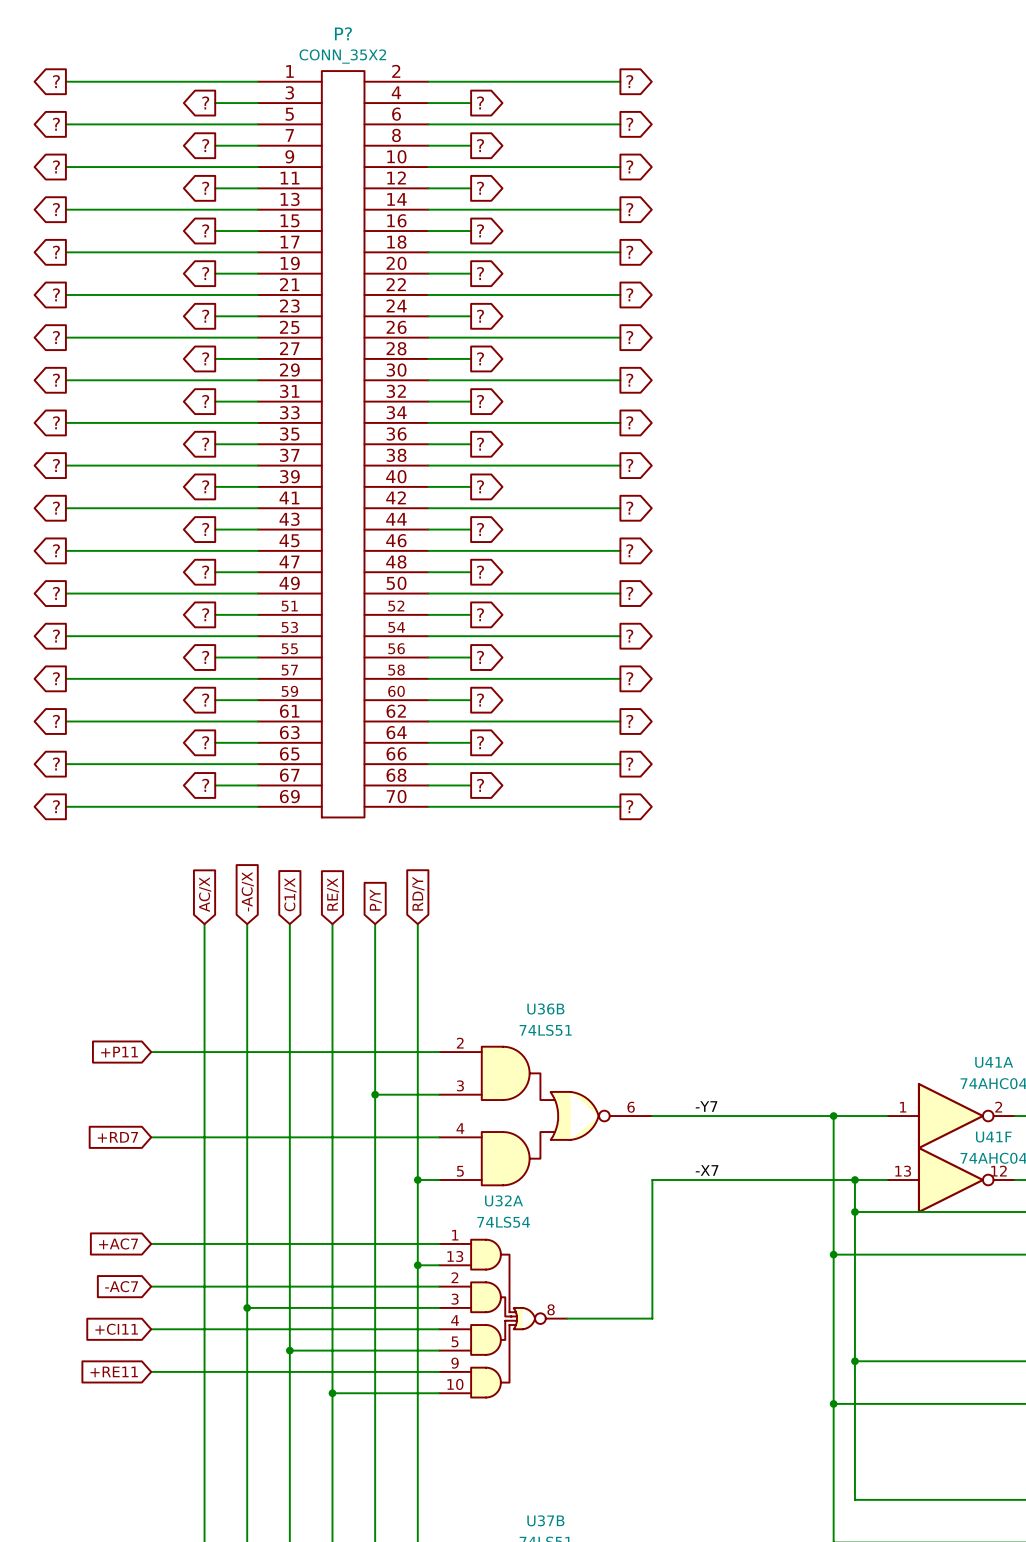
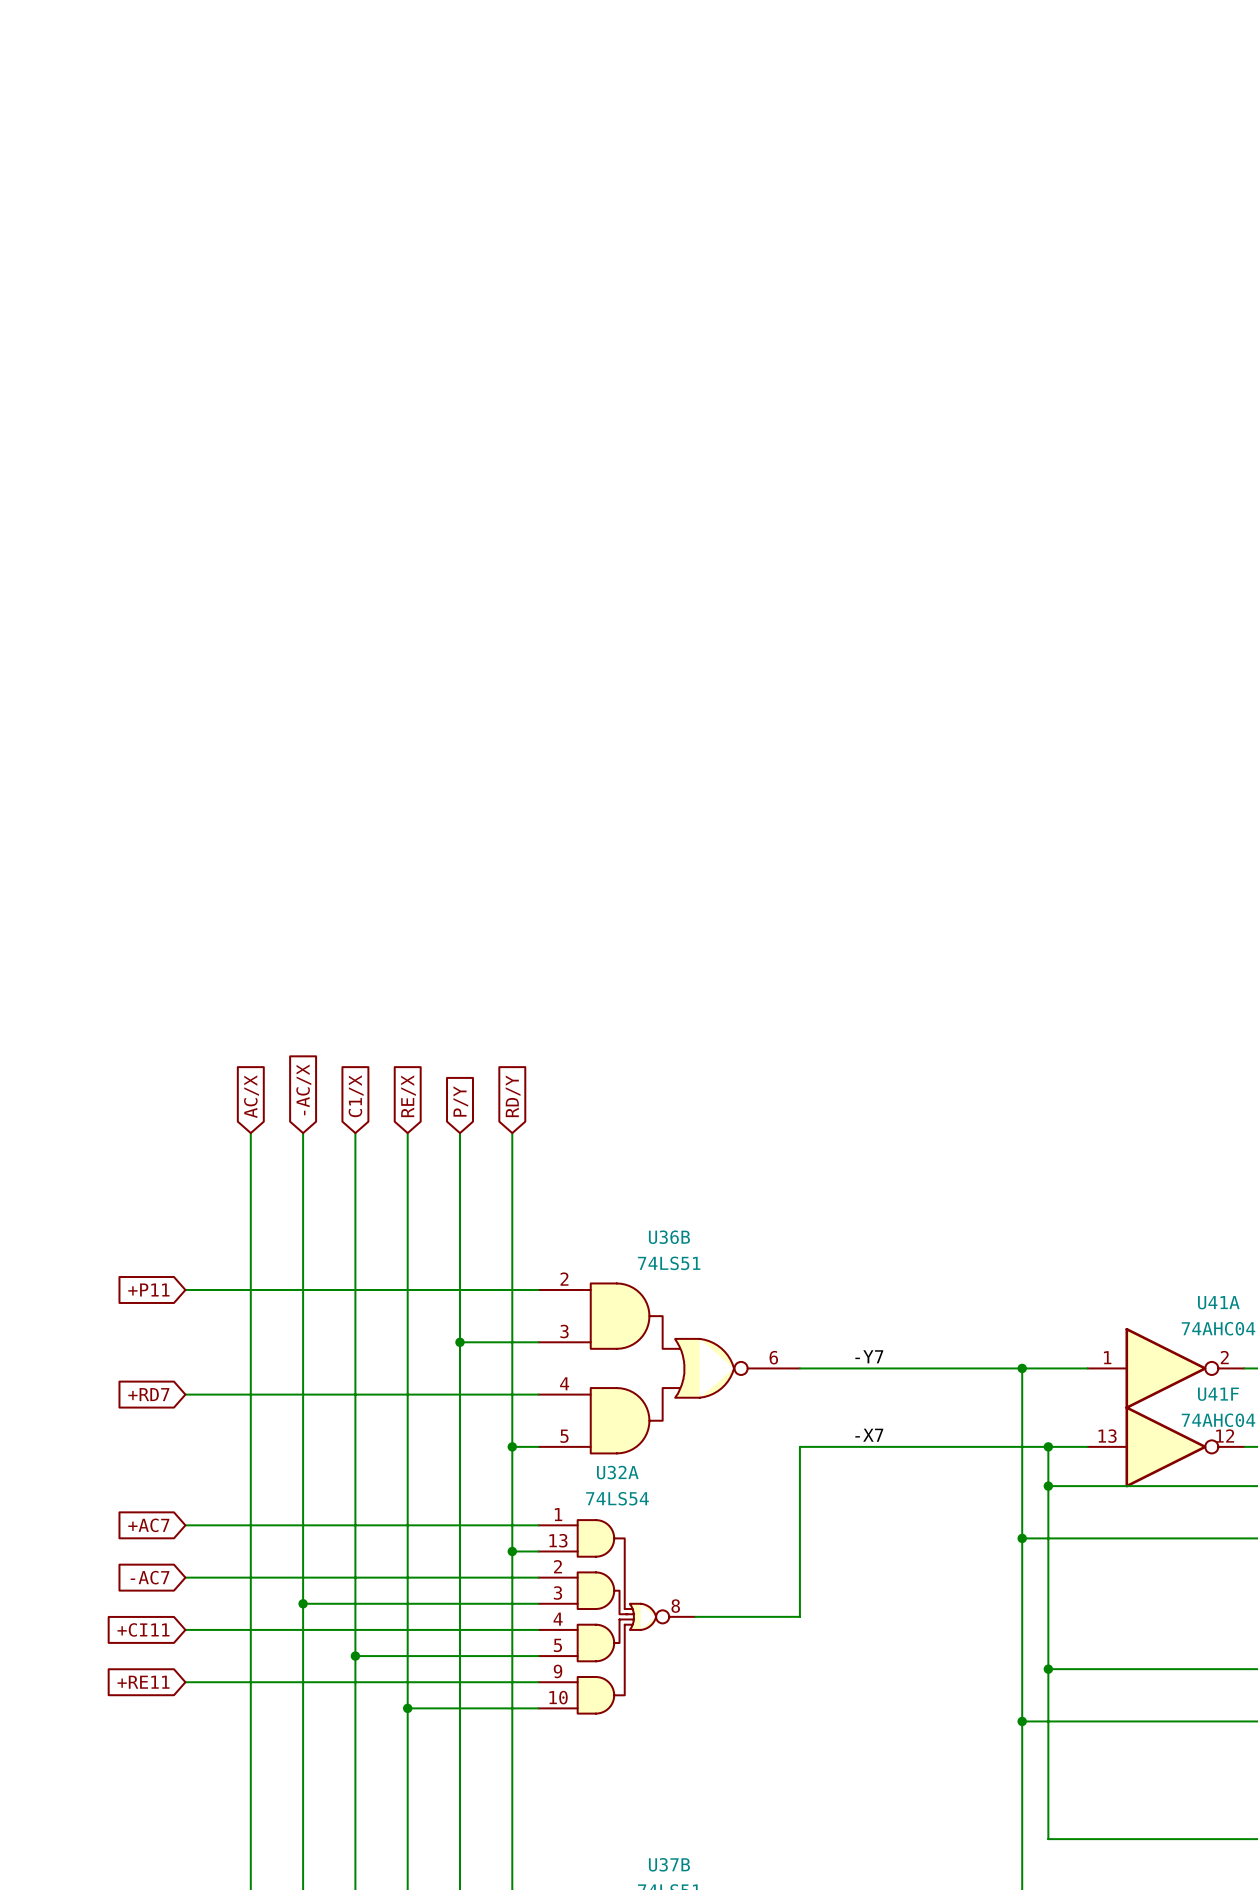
global label: ? (56, 81) -> none
wire: (65, 81) (257, 81) -> none
wire: (428, 81) (620, 81) -> none
global label: ? (629, 81) -> none
global label: ? (205, 102) -> none
global label: ? (480, 102) -> none
wire: (215, 103) (257, 103) -> none
wire: (428, 103) (471, 103) -> none
global label: ? (56, 124) -> none
wire: (65, 124) (257, 124) -> none
wire: (428, 124) (620, 124) -> none
global label: ? (629, 124) -> none
global label: ? (205, 145) -> none
wire: (215, 145) (257, 145) -> none
wire: (428, 145) (471, 145) -> none
global label: ? (480, 145) -> none
global label: ? (56, 166) -> none
global label: ? (629, 166) -> none
wire: (65, 167) (257, 167) -> none
wire: (428, 167) (620, 167) -> none
global label: ? (205, 188) -> none
wire: (215, 188) (257, 188) -> none
wire: (428, 188) (471, 188) -> none
global label: ? (480, 188) -> none
global label: ? (56, 209) -> none
wire: (65, 209) (257, 209) -> none
wire: (428, 209) (620, 209) -> none
global label: ? (629, 209) -> none
global label: ? (205, 230) -> none
global label: ? (480, 230) -> none
wire: (215, 231) (257, 231) -> none
wire: (428, 231) (471, 231) -> none
global label: ? (56, 252) -> none
wire: (65, 252) (257, 252) -> none
wire: (428, 252) (620, 252) -> none
global label: ? (629, 252) -> none
global label: ? (205, 273) -> none
wire: (215, 273) (257, 273) -> none
wire: (428, 273) (471, 273) -> none
global label: ? (480, 273) -> none
global label: ? (56, 294) -> none
wire: (65, 294) (257, 294) -> none
wire: (428, 294) (620, 294) -> none
global label: ? (629, 294) -> none
global label: ? (205, 316) -> none
wire: (215, 316) (257, 316) -> none
wire: (428, 316) (471, 316) -> none
global label: ? (480, 316) -> none
global label: ? (56, 337) -> none
wire: (65, 337) (257, 337) -> none
wire: (428, 337) (620, 337) -> none
global label: ? (629, 337) -> none
global label: ? (205, 358) -> none
wire: (215, 358) (257, 358) -> none
wire: (428, 358) (471, 358) -> none
global label: ? (480, 358) -> none
global label: ? (56, 380) -> none
wire: (65, 380) (257, 380) -> none
wire: (428, 380) (620, 380) -> none
global label: ? (629, 380) -> none
global label: ? (205, 401) -> none
wire: (215, 401) (257, 401) -> none
wire: (428, 401) (471, 401) -> none
global label: ? (480, 401) -> none
global label: ? (56, 422) -> none
wire: (65, 422) (257, 422) -> none
wire: (428, 422) (620, 422) -> none
global label: ? (629, 422) -> none
global label: ? (205, 444) -> none
wire: (215, 444) (257, 444) -> none
P?: CONN_35X2 (343, 444) -> none
wire: (428, 444) (471, 444) -> none
global label: ? (480, 444) -> none
global label: ? (56, 465) -> none
wire: (65, 465) (257, 465) -> none
wire: (428, 465) (620, 465) -> none
global label: ? (629, 465) -> none
global label: ? (205, 486) -> none
wire: (215, 486) (257, 486) -> none
wire: (428, 486) (471, 486) -> none
global label: ? (480, 486) -> none
global label: ? (56, 508) -> none
wire: (65, 508) (257, 508) -> none
wire: (428, 508) (620, 508) -> none
global label: ? (629, 508) -> none
global label: ? (205, 529) -> none
wire: (215, 529) (257, 529) -> none
wire: (428, 529) (471, 529) -> none
global label: ? (480, 529) -> none
global label: ? (56, 550) -> none
wire: (65, 550) (257, 550) -> none
wire: (428, 550) (620, 550) -> none
global label: ? (629, 550) -> none
global label: ? (205, 572) -> none
wire: (215, 572) (257, 572) -> none
wire: (428, 572) (471, 572) -> none
global label: ? (480, 572) -> none
global label: ? (56, 593) -> none
wire: (65, 593) (257, 593) -> none
wire: (428, 593) (620, 593) -> none
global label: ? (629, 593) -> none
global label: ? (205, 614) -> none
wire: (215, 614) (257, 614) -> none
wire: (428, 614) (471, 614) -> none
global label: ? (480, 614) -> none
global label: ? (56, 636) -> none
wire: (65, 636) (257, 636) -> none
wire: (428, 636) (620, 636) -> none
global label: ? (629, 636) -> none
global label: ? (205, 657) -> none
wire: (215, 657) (257, 657) -> none
wire: (428, 657) (471, 657) -> none
global label: ? (480, 657) -> none
global label: ? (56, 678) -> none
wire: (65, 678) (257, 678) -> none
wire: (428, 678) (620, 678) -> none
global label: ? (629, 678) -> none
global label: ? (205, 700) -> none
wire: (215, 700) (257, 700) -> none
wire: (428, 700) (471, 700) -> none
global label: ? (480, 700) -> none
global label: ? (56, 721) -> none
wire: (65, 721) (257, 721) -> none
wire: (428, 721) (620, 721) -> none
global label: ? (629, 721) -> none
global label: ? (205, 742) -> none
wire: (215, 742) (257, 742) -> none
wire: (428, 742) (471, 742) -> none
global label: ? (480, 742) -> none
global label: ? (56, 764) -> none
wire: (65, 764) (257, 764) -> none
wire: (428, 764) (620, 764) -> none
global label: ? (629, 764) -> none
global label: ? (205, 785) -> none
wire: (215, 785) (257, 785) -> none
wire: (428, 785) (471, 785) -> none
global label: ? (480, 785) -> none
global label: ? (56, 806) -> none
wire: (65, 806) (257, 806) -> none
wire: (428, 806) (620, 806) -> none
global label: ? (629, 806) -> none

